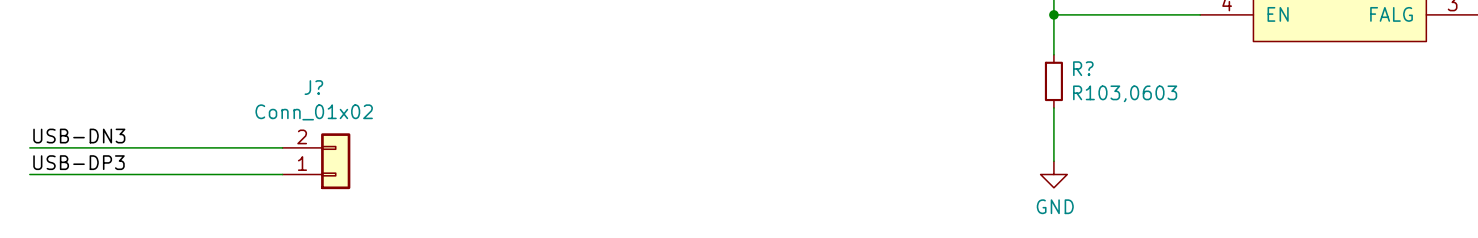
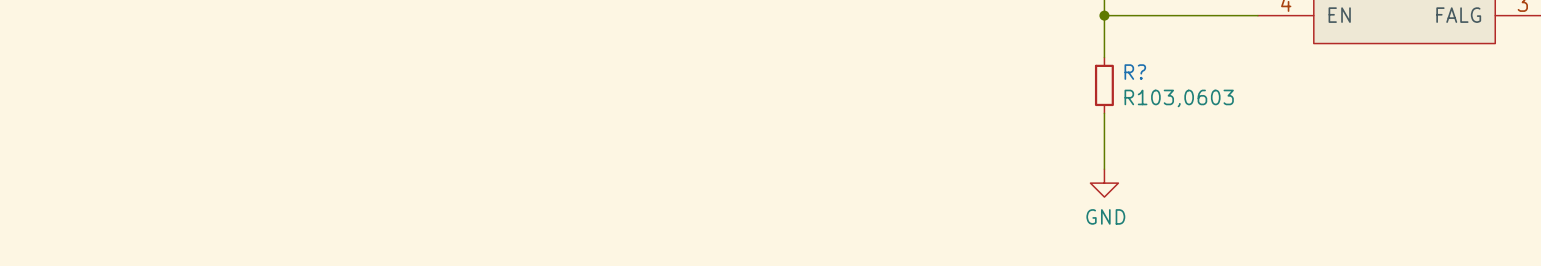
label: USB-DN3 (79, 136) -> none
wire: (29, 147) (282, 147) -> none
J?: Conn_01x02 (316, 161) -> none
label: USB-DP3 (79, 162) -> none
wire: (29, 174) (282, 174) -> none

